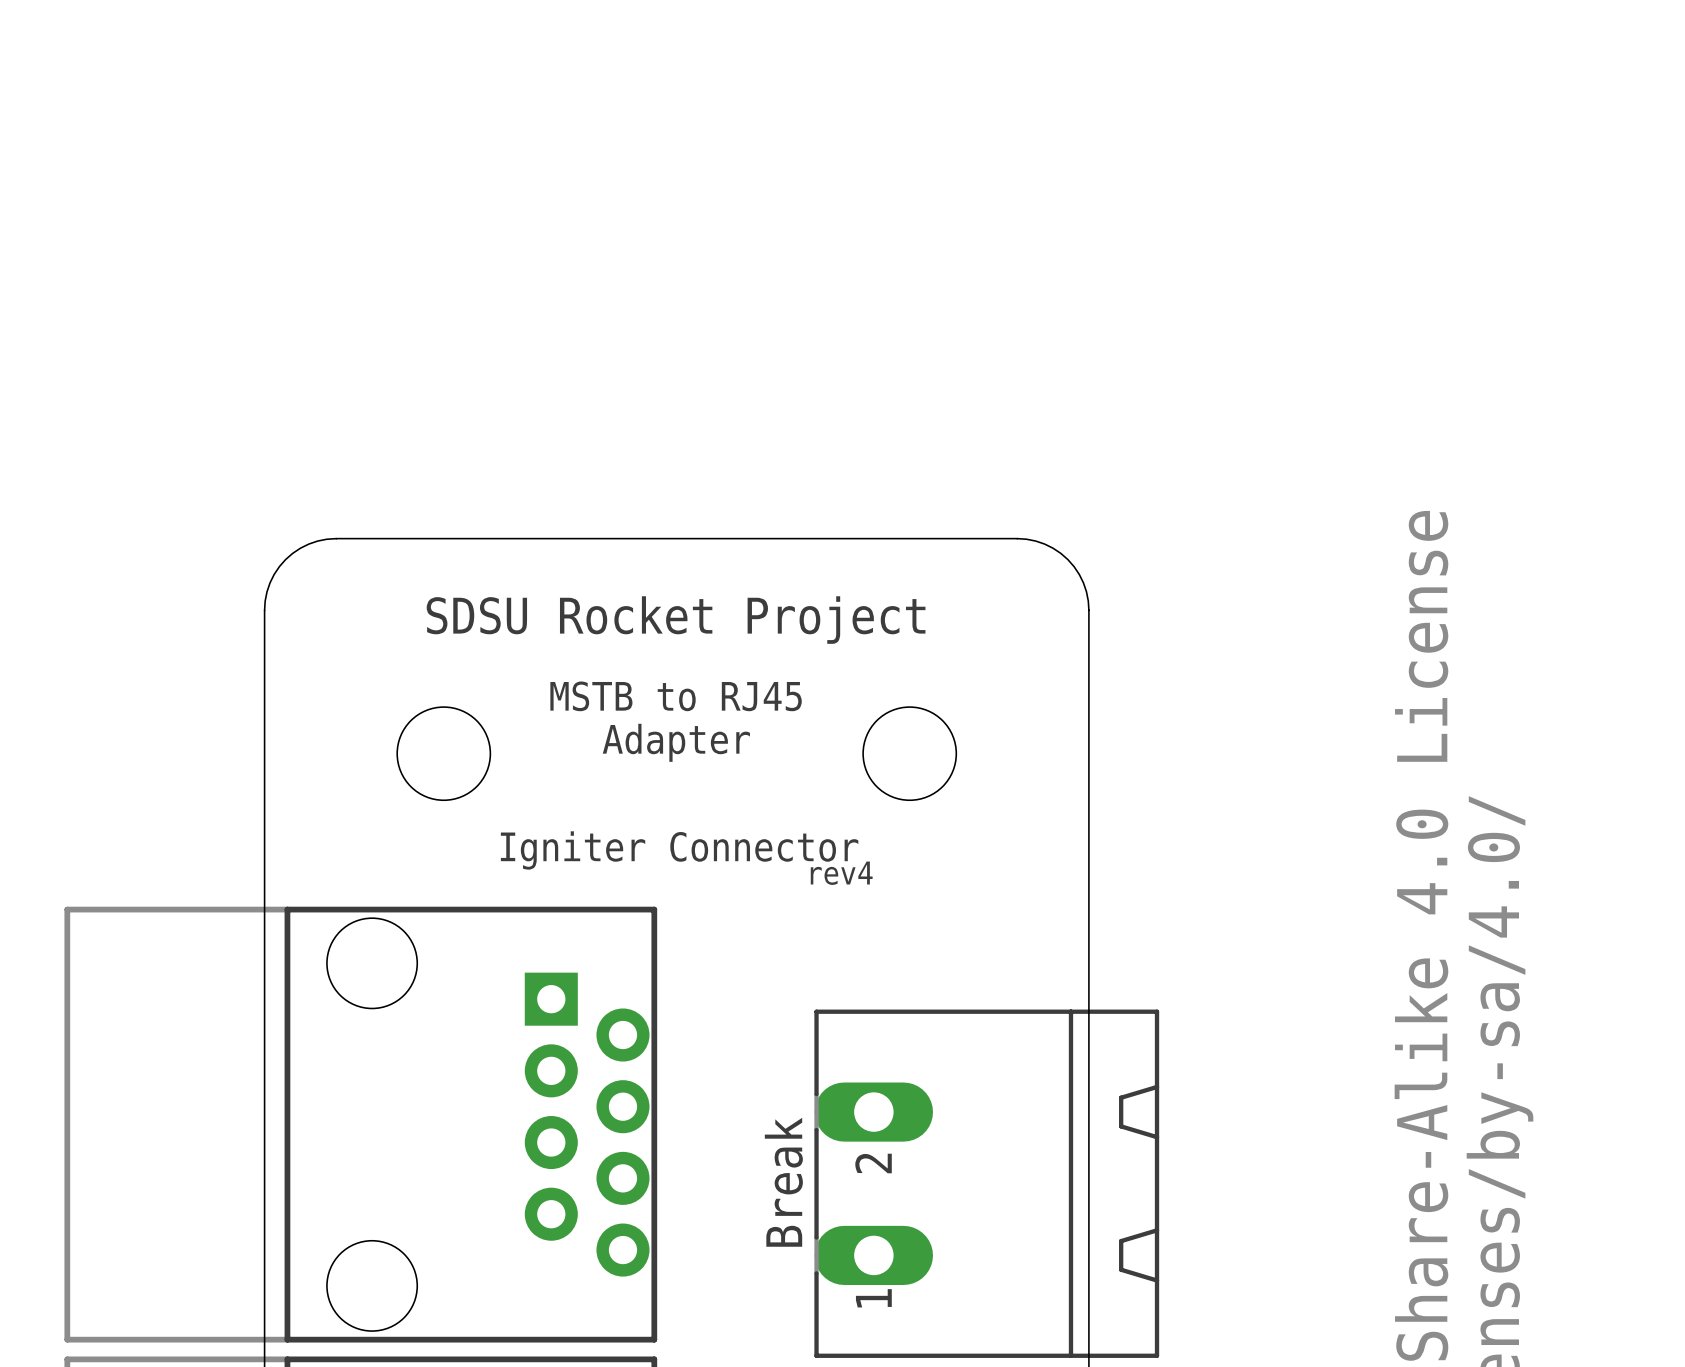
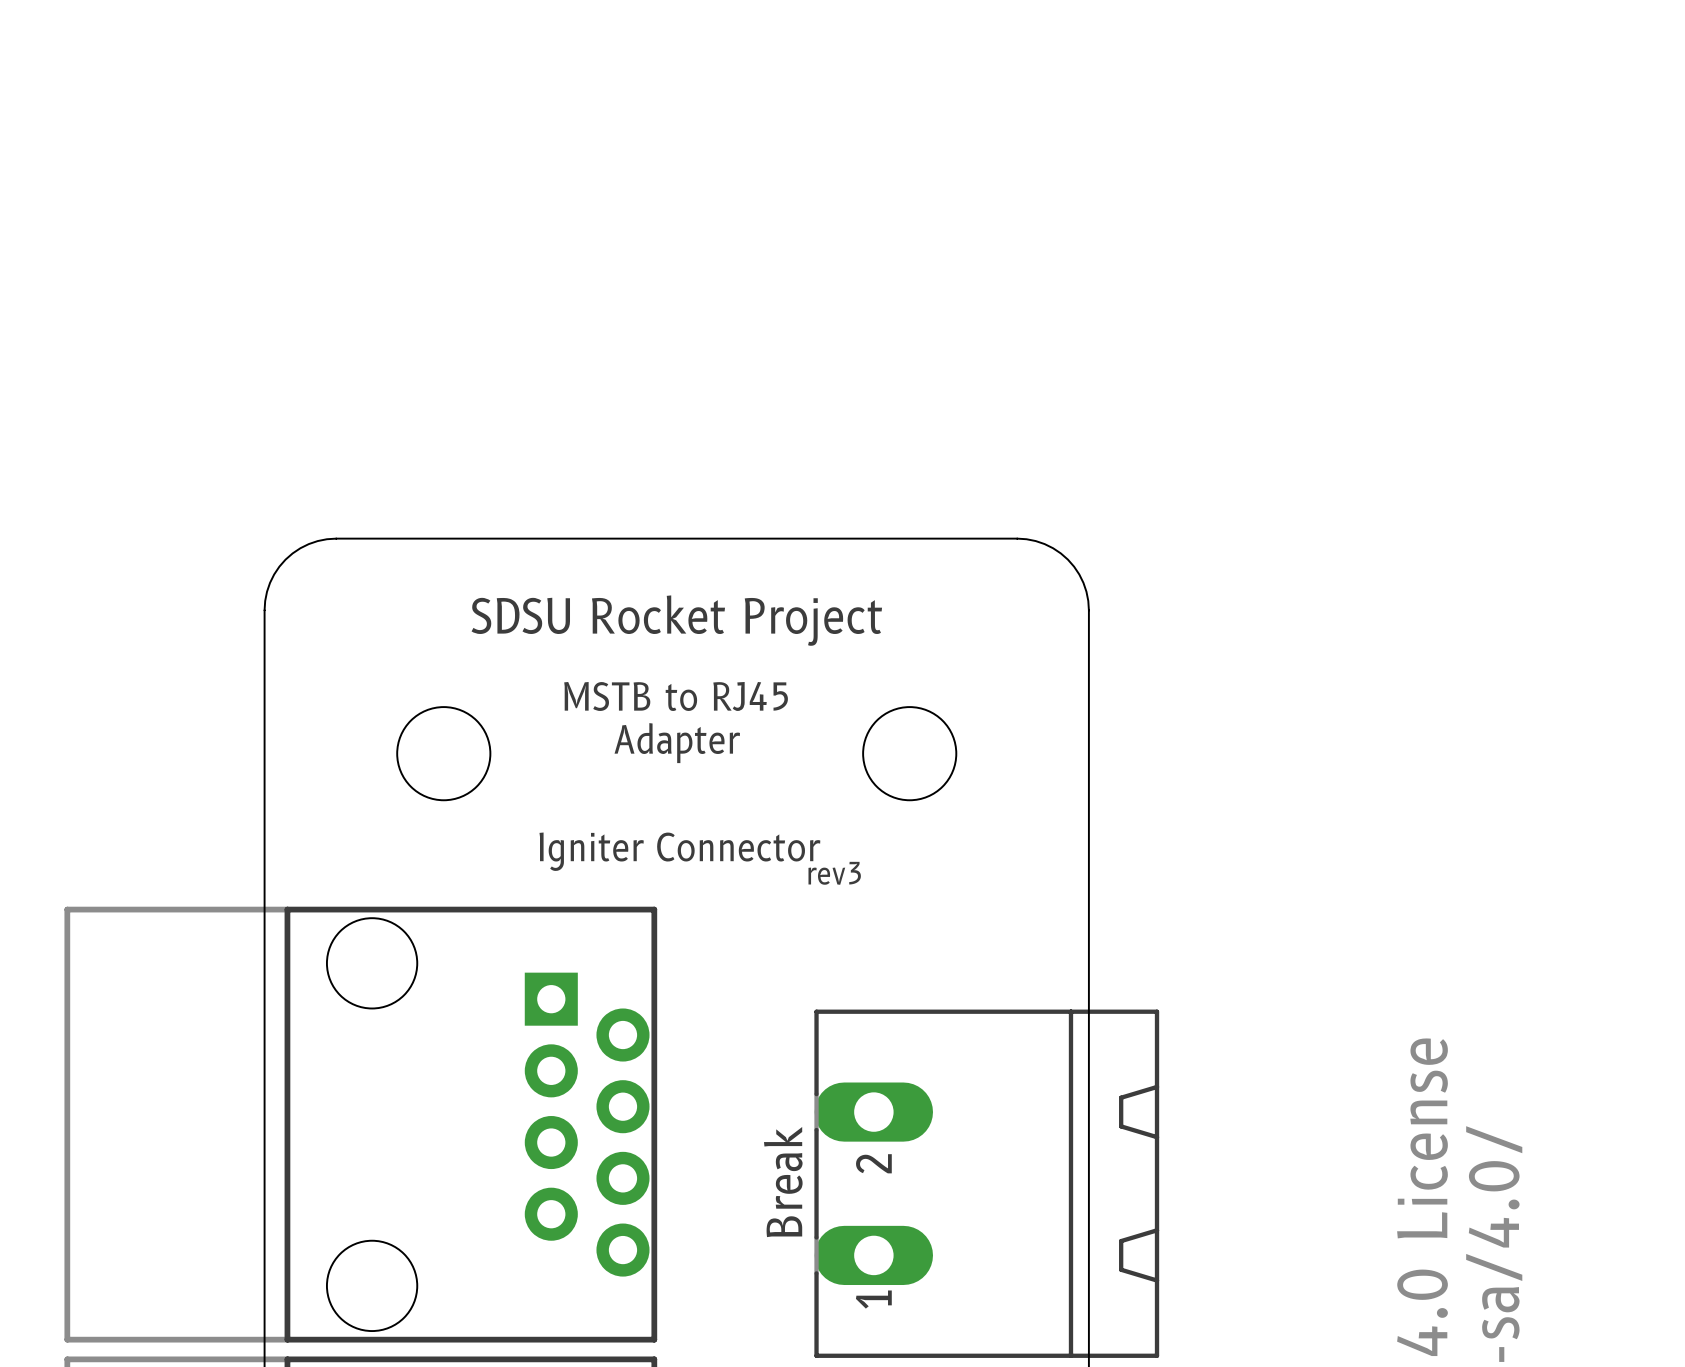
text: rev4 (841, 873) -> rev3 (834, 873)

